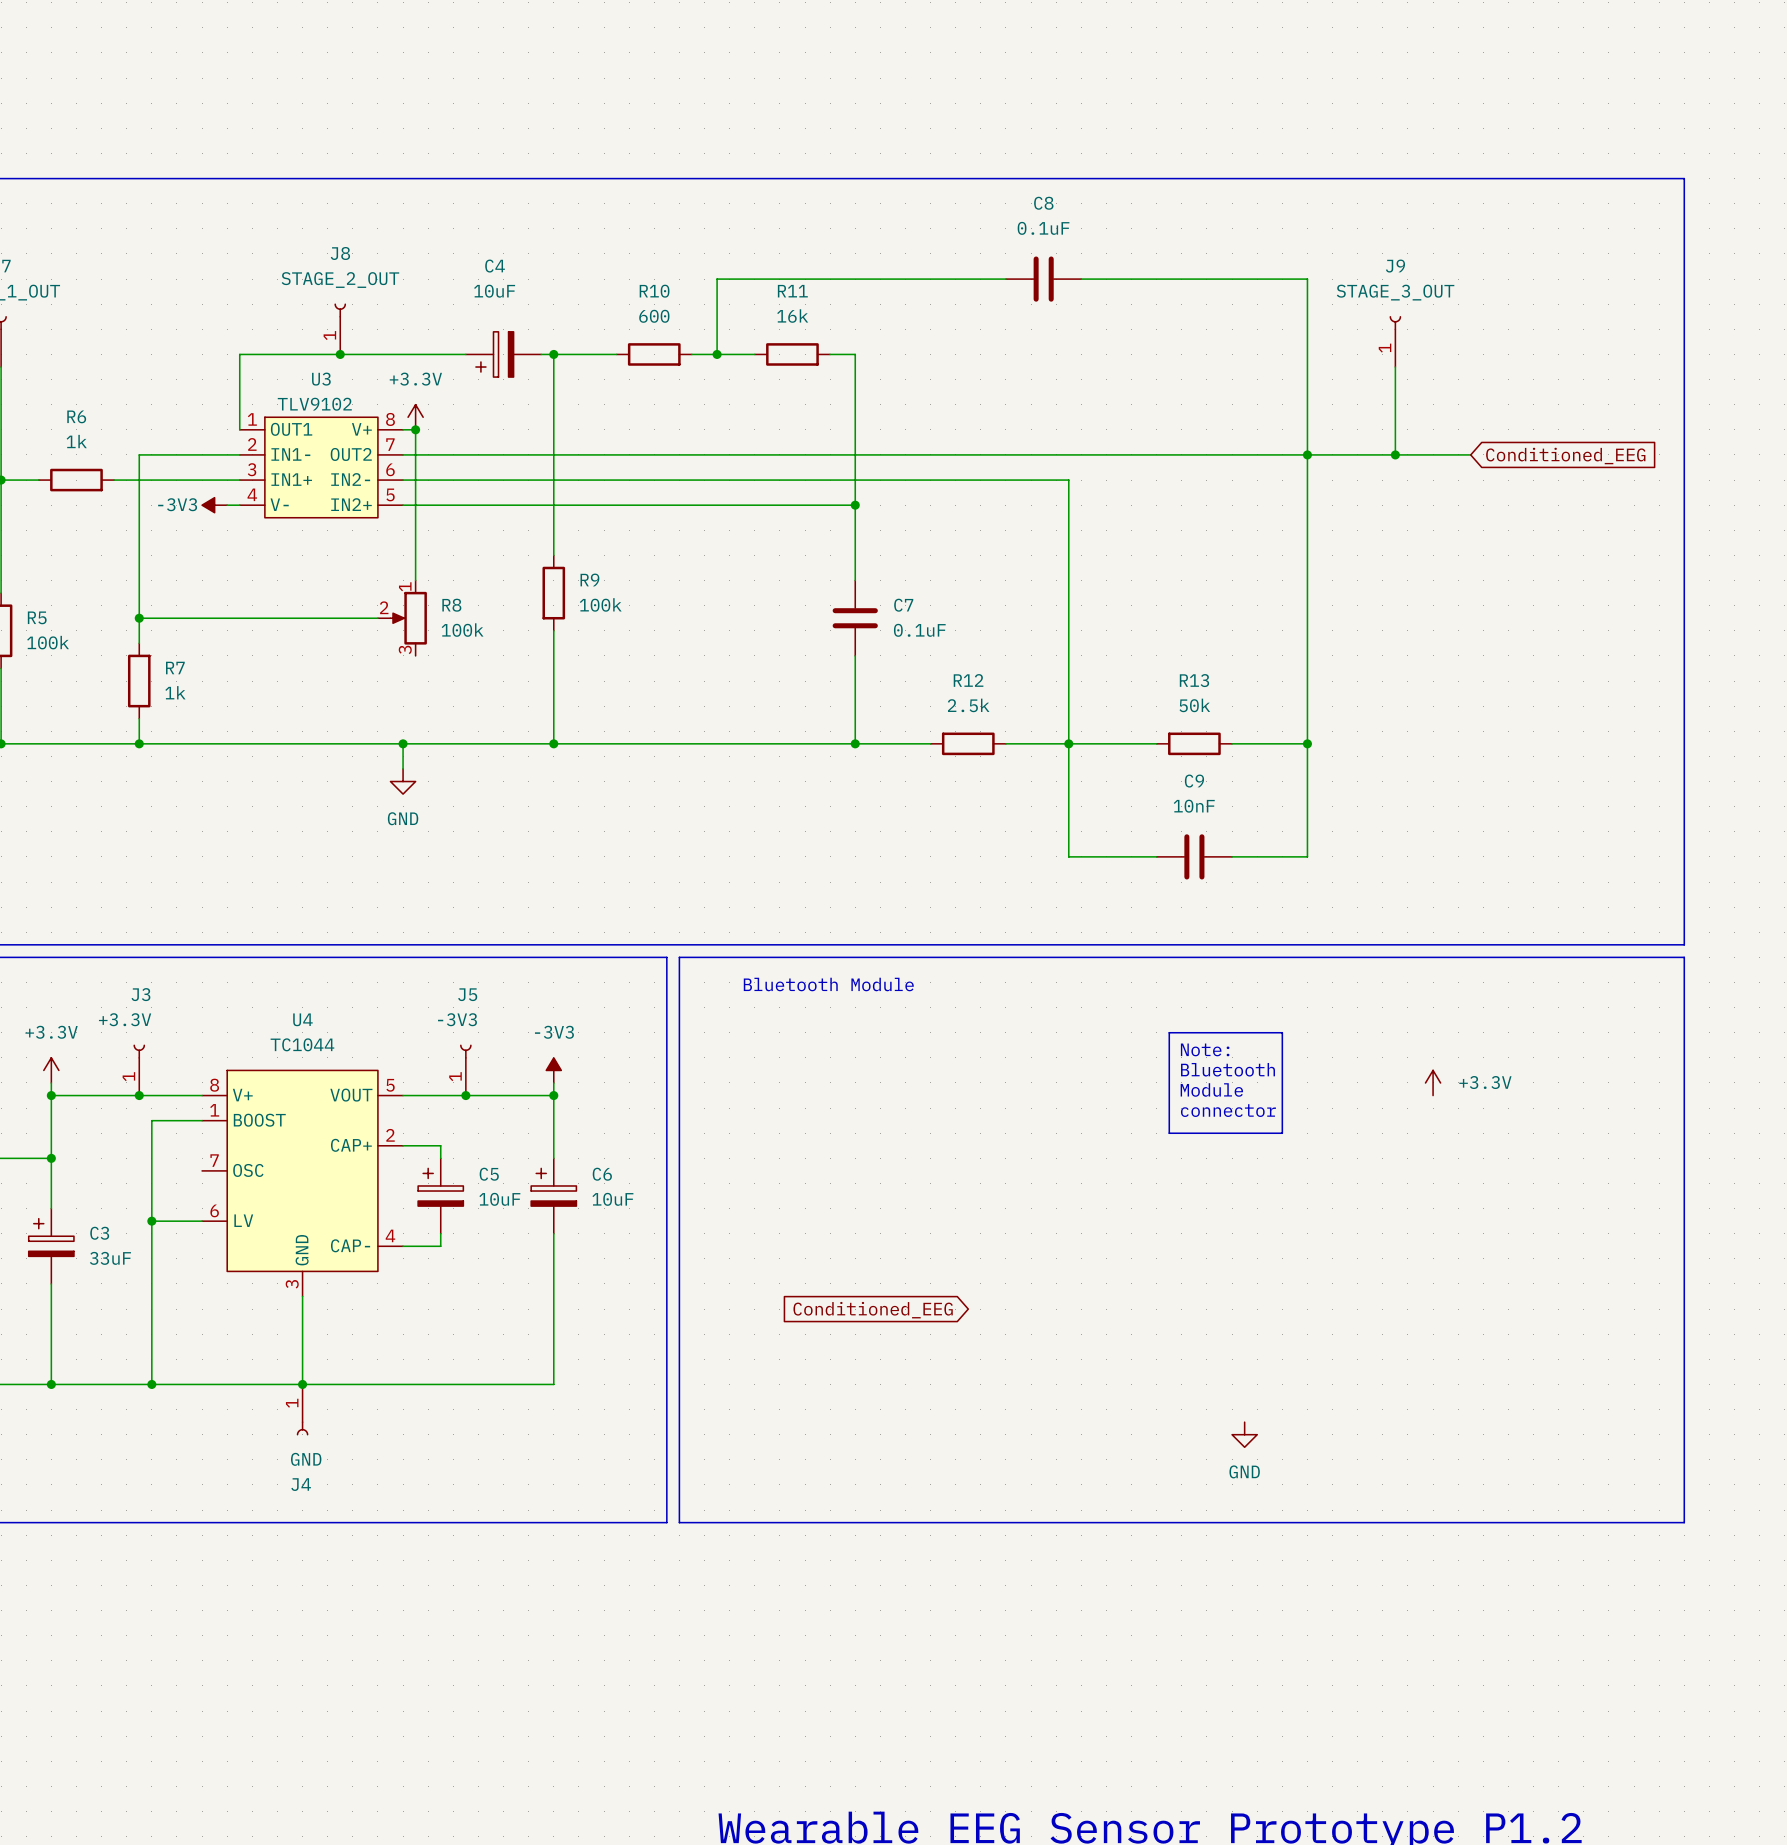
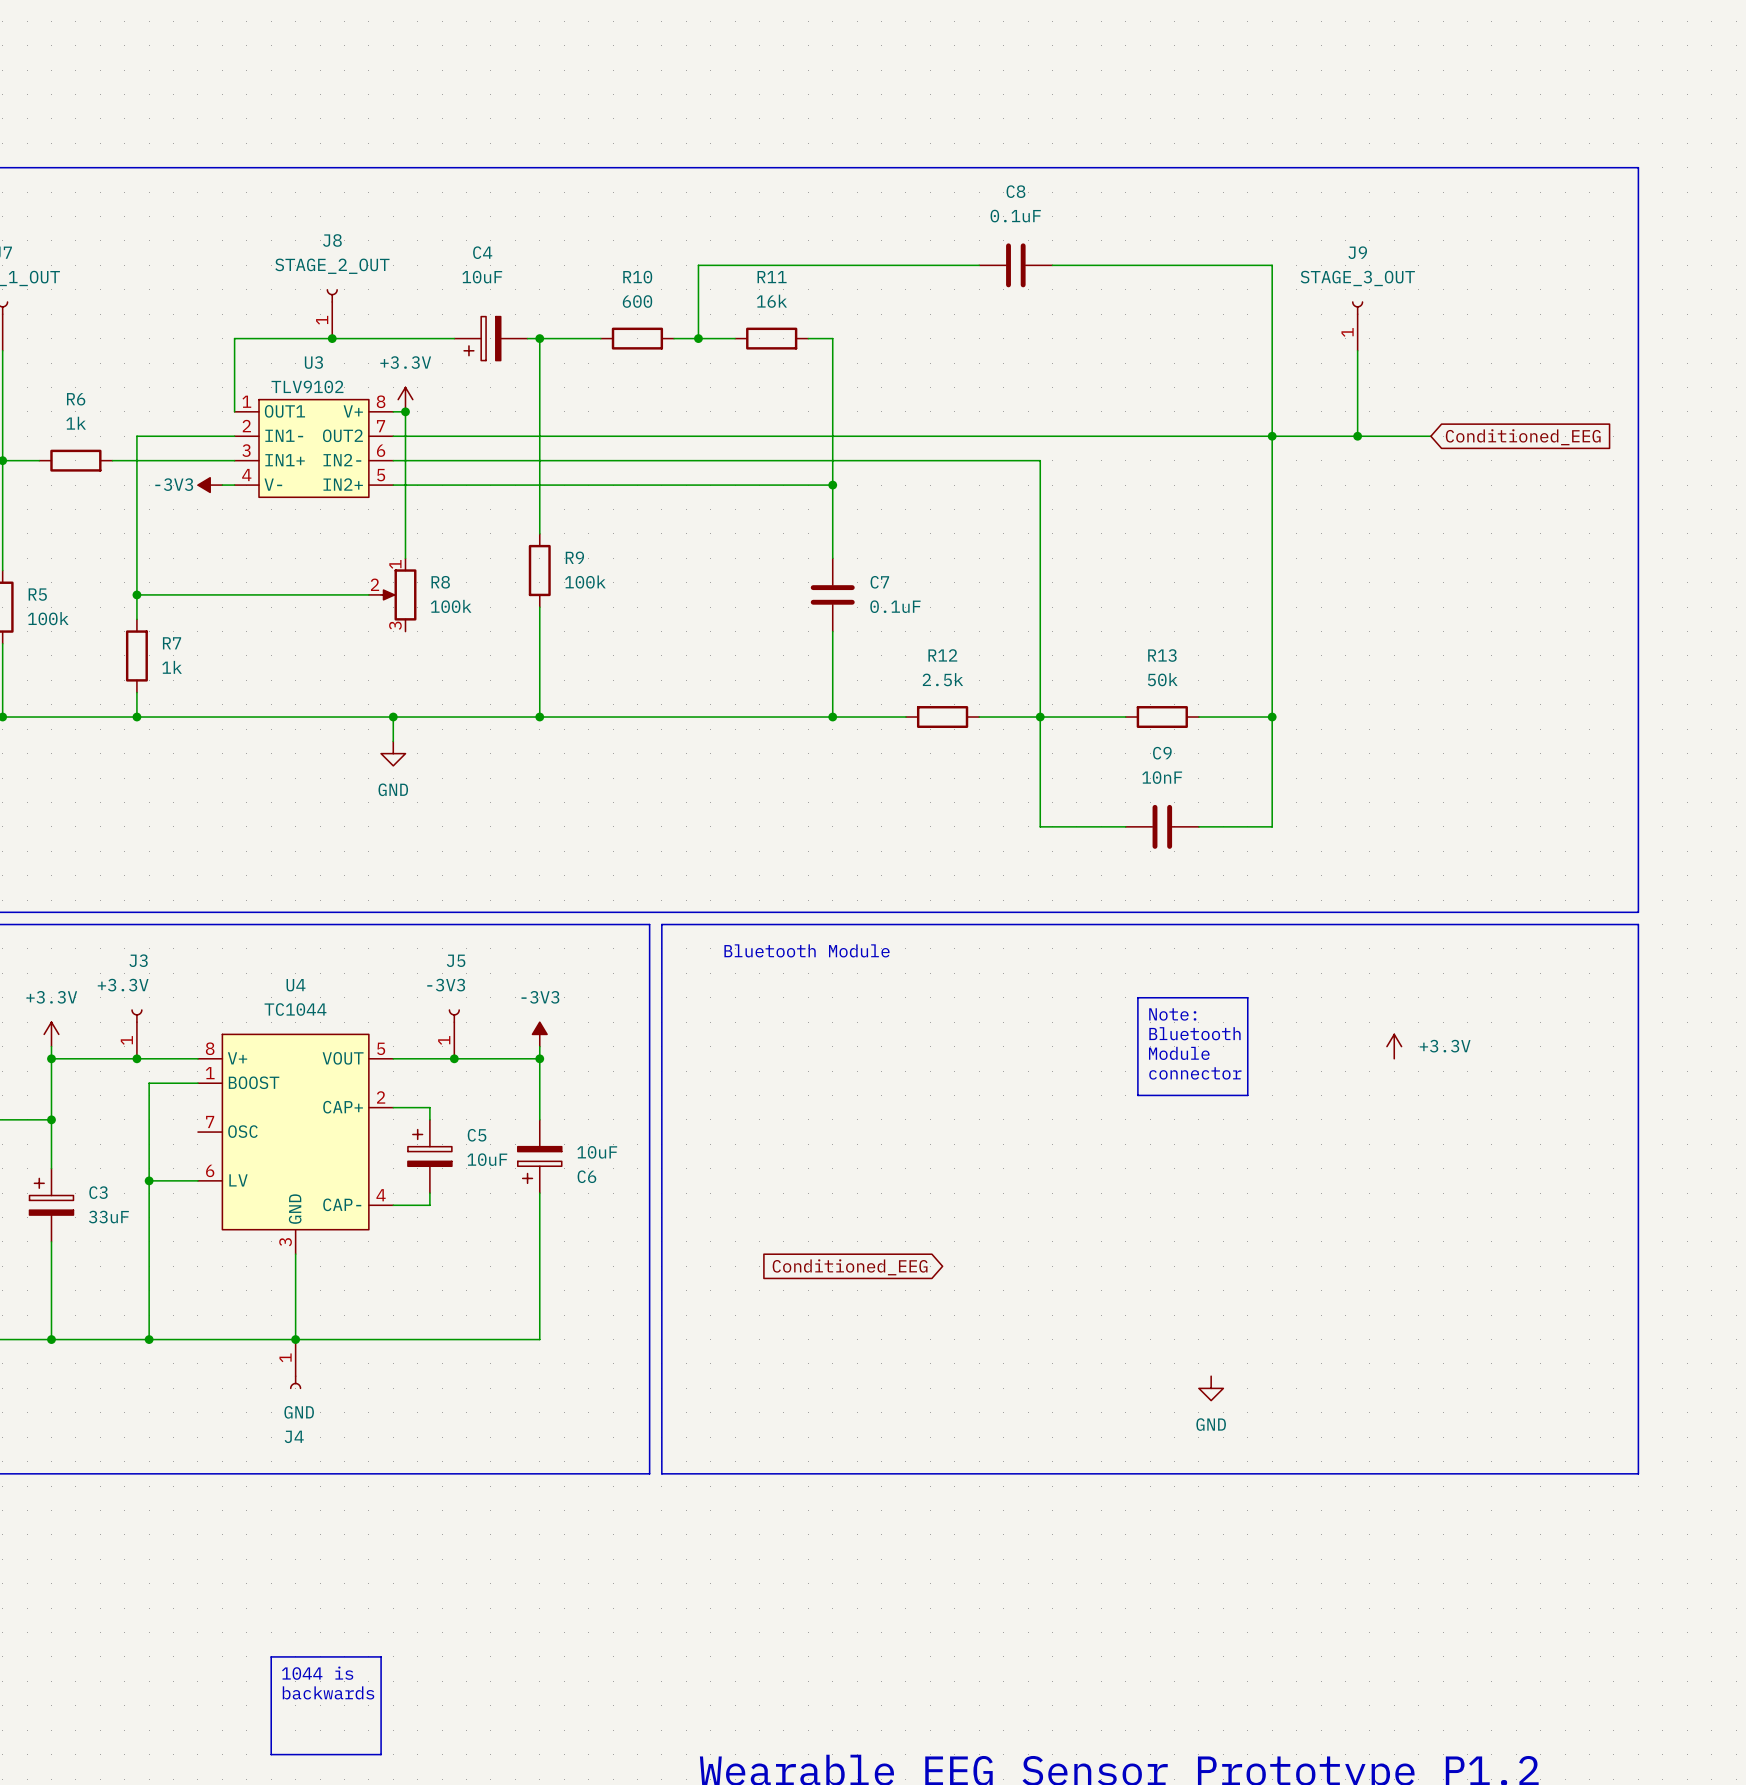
C6 flip: as is (553, 1187) -> up-down (539, 1165)
line: none -> (271, 1656) (381, 1656) (381, 1754) (271, 1754) (271, 1656)
text: none -> 1044 is (317, 1673)
text: none -> backwards (328, 1692)

